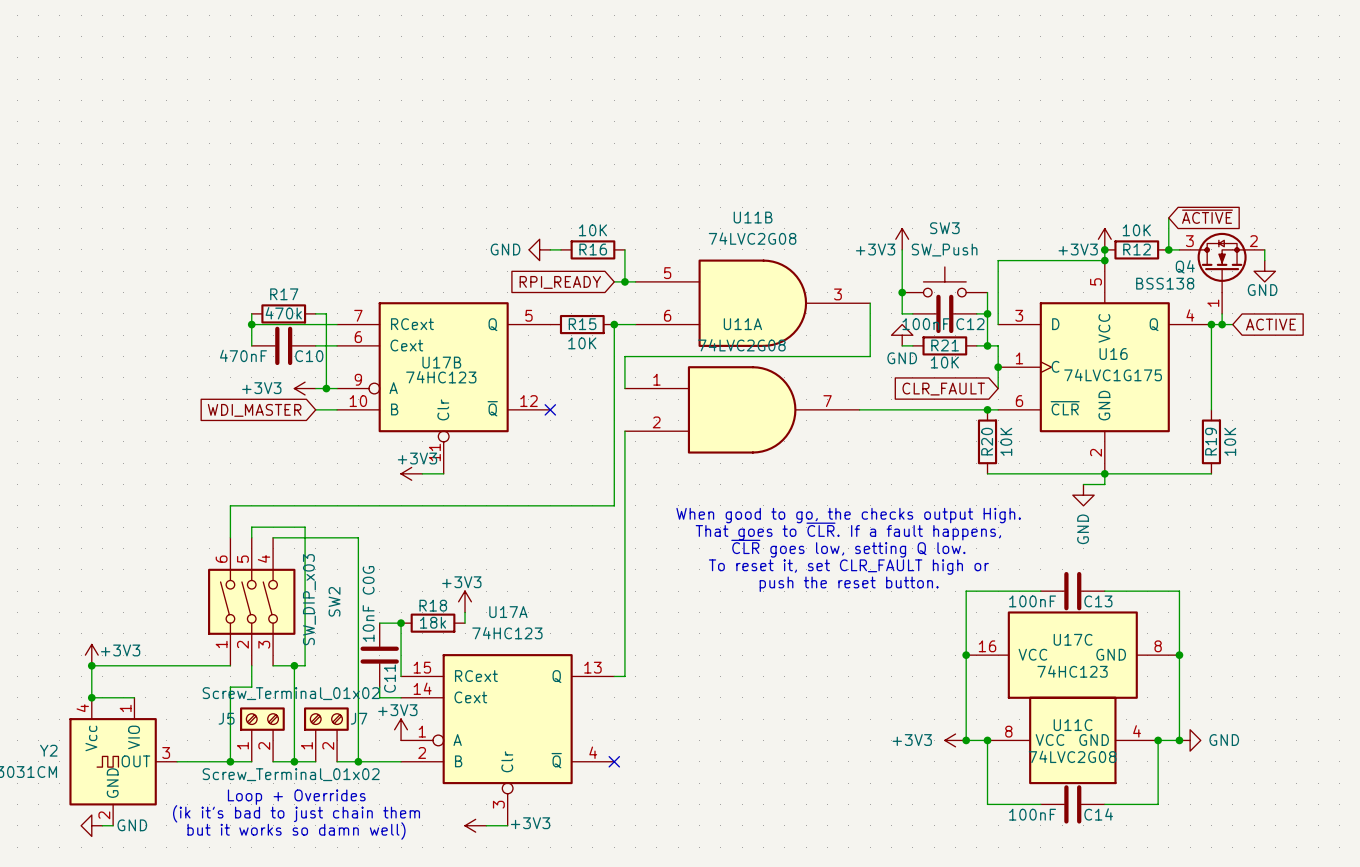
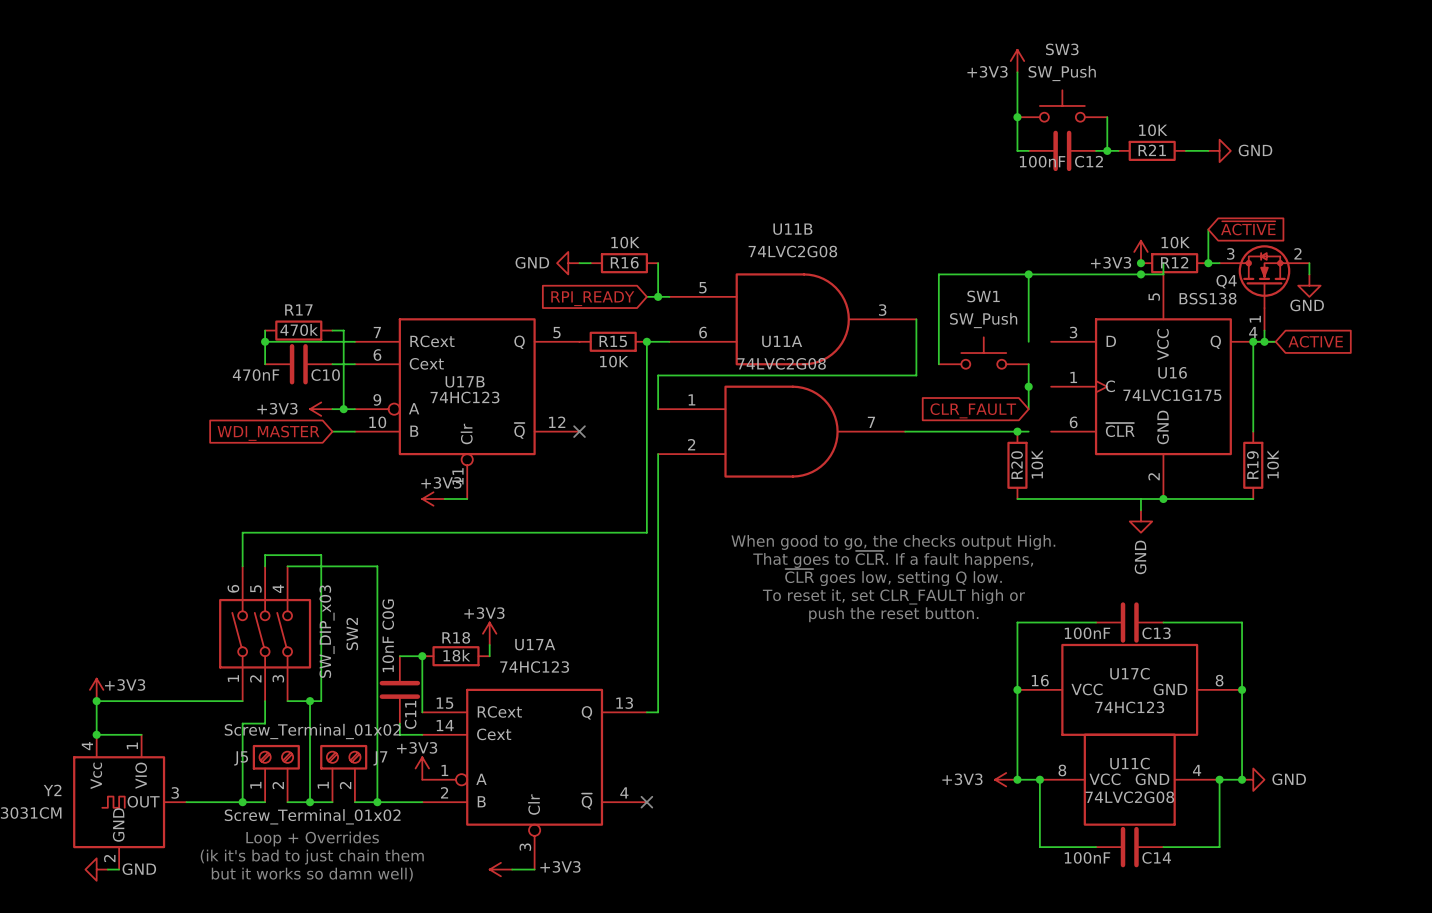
power symbol: none -> +3V3 (1017, 61)
wire: none -> (1017, 72) (1017, 150) (1028, 150)
junction: none -> (1017, 117)
wire: none -> (1107, 117) (1107, 150)
wire: none -> (1096, 150) (1118, 150)
junction: none -> (1107, 150)
wire: none -> (1185, 150) (1208, 150)
power symbol: none -> GND (1219, 150)
global label position: ~{ACTIVE} (1207, 216) -> ~{ACTIVE} (1248, 228)
wire: (1168, 217) (1168, 249) (1179, 249) -> (1208, 229) (1208, 263) (1219, 263)
power symbol: +3V3 (902, 239) -> none
power symbol position: +3V3 (1104, 239) -> +3V3 (1140, 251)
wire: (902, 249) (902, 313) (912, 313) -> none
junction: none -> (1140, 263)
junction: (1104, 249) -> none
R12 position: (1136, 249) -> (1174, 263)
junction: none -> (1208, 263)
junction: (1168, 249) -> none
wire: (1264, 249) (1264, 260) -> (1309, 263) (1309, 274)
wire: none -> (1028, 274) (1028, 341)
junction: none -> (1028, 274)
wire: (998, 260) (998, 324) -> (1051, 274) (938, 274) (938, 364)
junction: none -> (1140, 274)
junction: (1104, 260) -> none
power symbol position: GND (1264, 271) -> GND (1309, 285)
Q4 position: (1222, 273) -> (1264, 287)
SW3 position: (944, 281) -> (1062, 105)
junction: (902, 292) -> none
wire: (987, 292) (987, 345) -> none
C12 position: (944, 313) -> (1062, 150)
wire: (976, 313) (987, 313) -> none
junction: (987, 313) -> none
wire: (1222, 313) (1222, 324) -> (1264, 330) (1264, 341)
junction: none -> (1253, 341)
junction: none -> (1264, 341)
junction: (1211, 324) -> none
junction: (1222, 324) -> none
wire: (1232, 324) (1211, 324) (1211, 409) -> (1275, 341) (1253, 341) (1253, 431)
global label position: ACTIVE (1270, 324) -> ACTIVE (1315, 341)
power symbol: GND (902, 335) -> none
SW1: none -> SW_Push (983, 353)
R21 position: (944, 345) -> (1152, 150)
wire: (976, 345) (998, 345) (998, 388) -> (1028, 364) (1028, 409)
junction: (987, 345) -> none
R21 value position: 10K (944, 362) -> 10K (1153, 130)
junction: none -> (1028, 386)
junction: (998, 367) -> none
global label position: CLR_FAULT (943, 389) -> CLR_FAULT (973, 410)
wire: (976, 409) (998, 409) -> (1017, 499) (1039, 499)
junction position: (987, 409) -> (1017, 431)
R20 position: (987, 441) -> (1017, 465)
R19 position: (1211, 441) -> (1253, 465)
wire: (1104, 473) (1104, 484) (1083, 484) -> (1140, 499) (1140, 510)
wire: (1190, 473) (1211, 473) -> none

